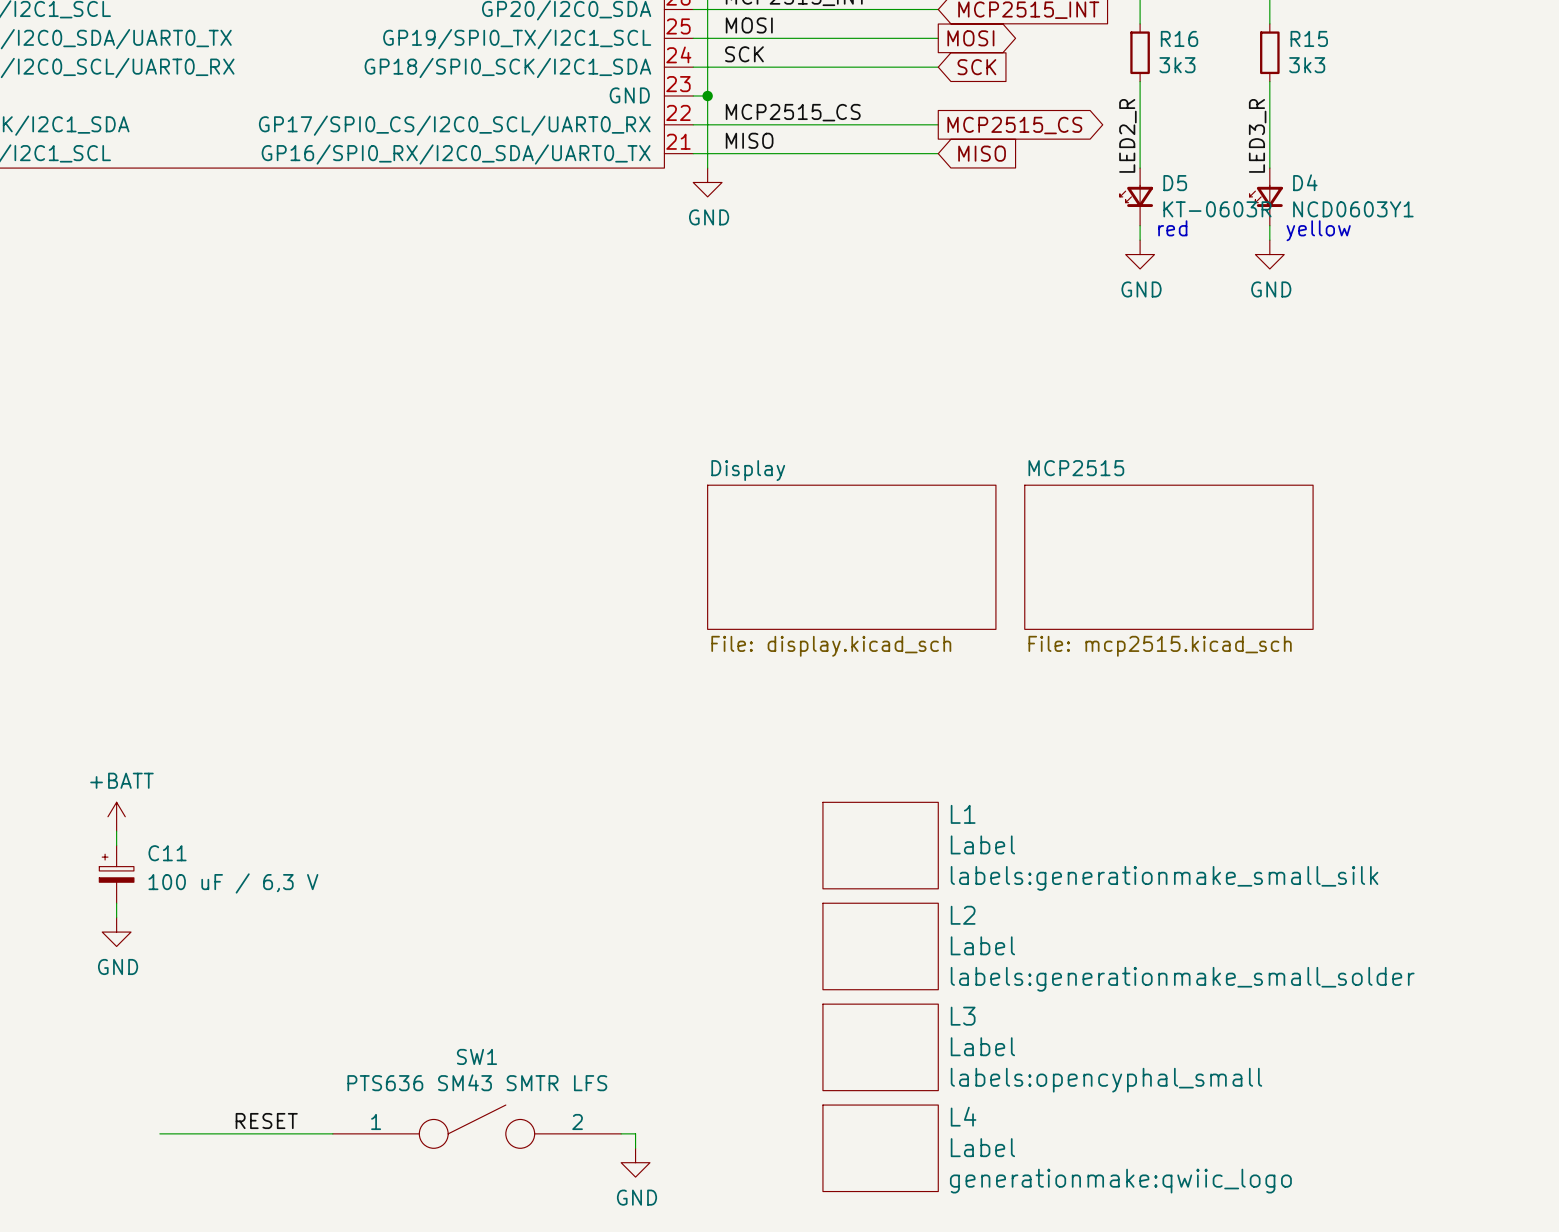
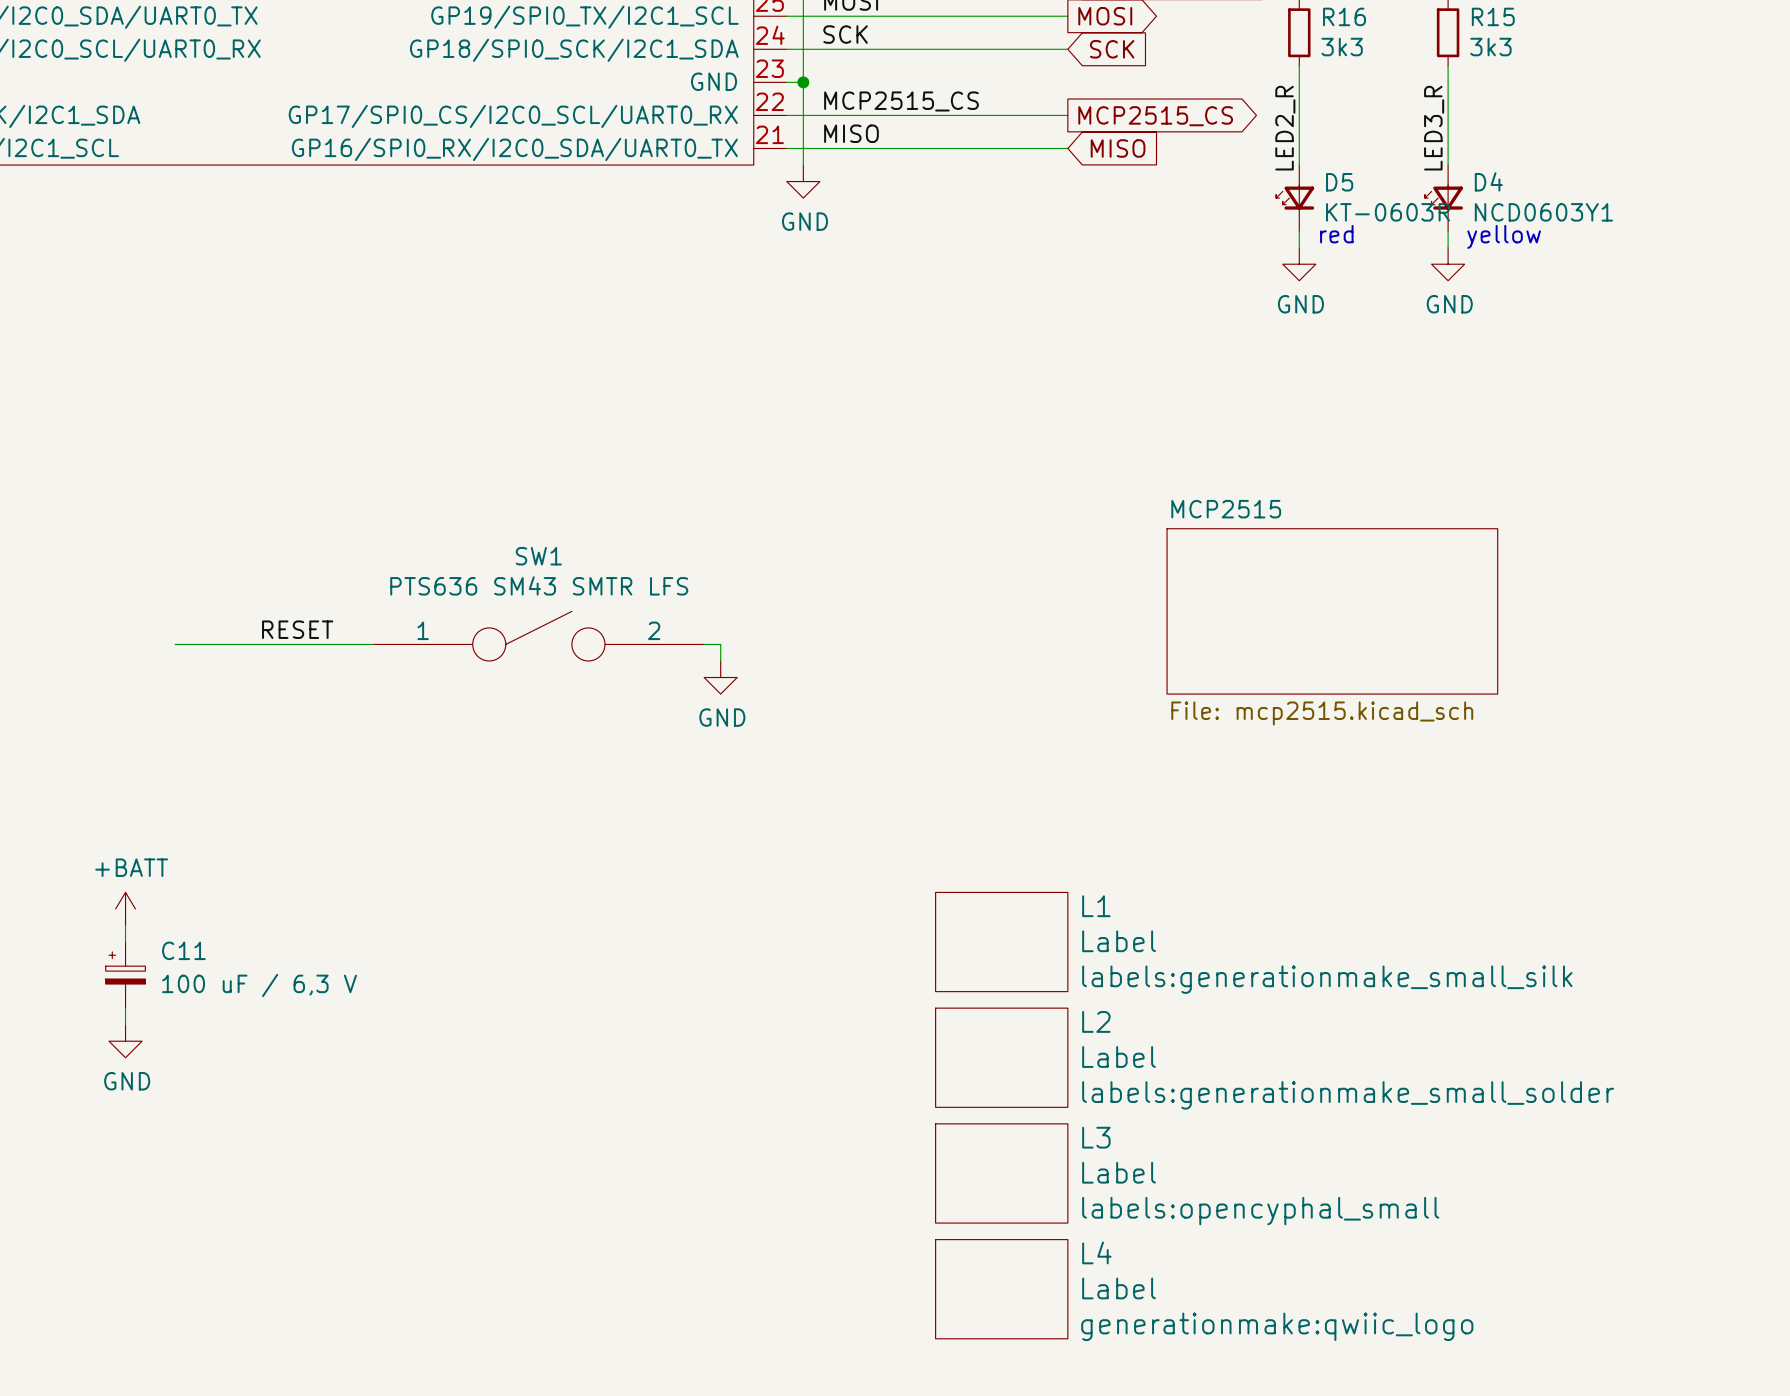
sheet Display: File: display.kicad_sch (851, 557) -> none
label: none -> RESET (297, 629)
wire: none -> (175, 644) (373, 644)
wire: none -> (704, 644) (720, 644) (720, 660)
power symbol: none -> GND (720, 677)
label: RESET (266, 1121) -> none
SW1 position: (476, 1126) -> (538, 636)
wire: (159, 1133) (332, 1133) -> none
wire: (621, 1133) (635, 1133) (635, 1148) -> none
power symbol: GND (635, 1162) -> none

